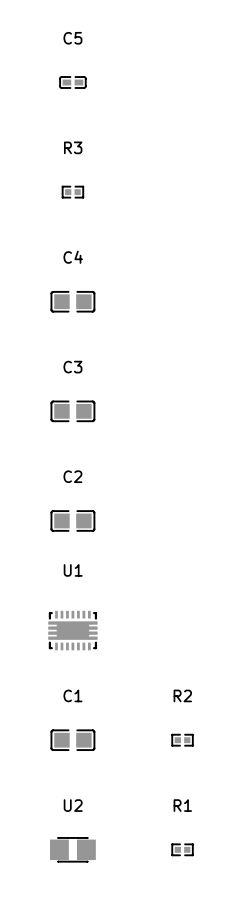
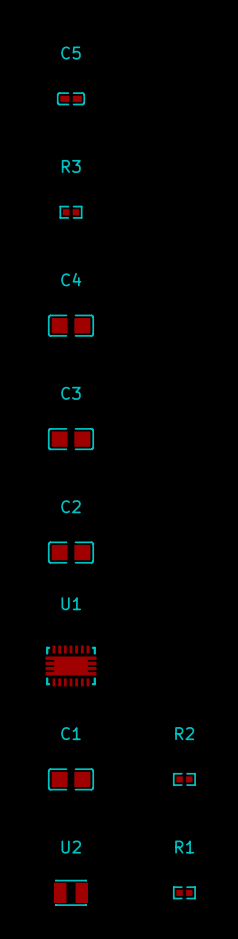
U2 footprint: [50, 837, 96, 863] -> [53, 879, 89, 907]

